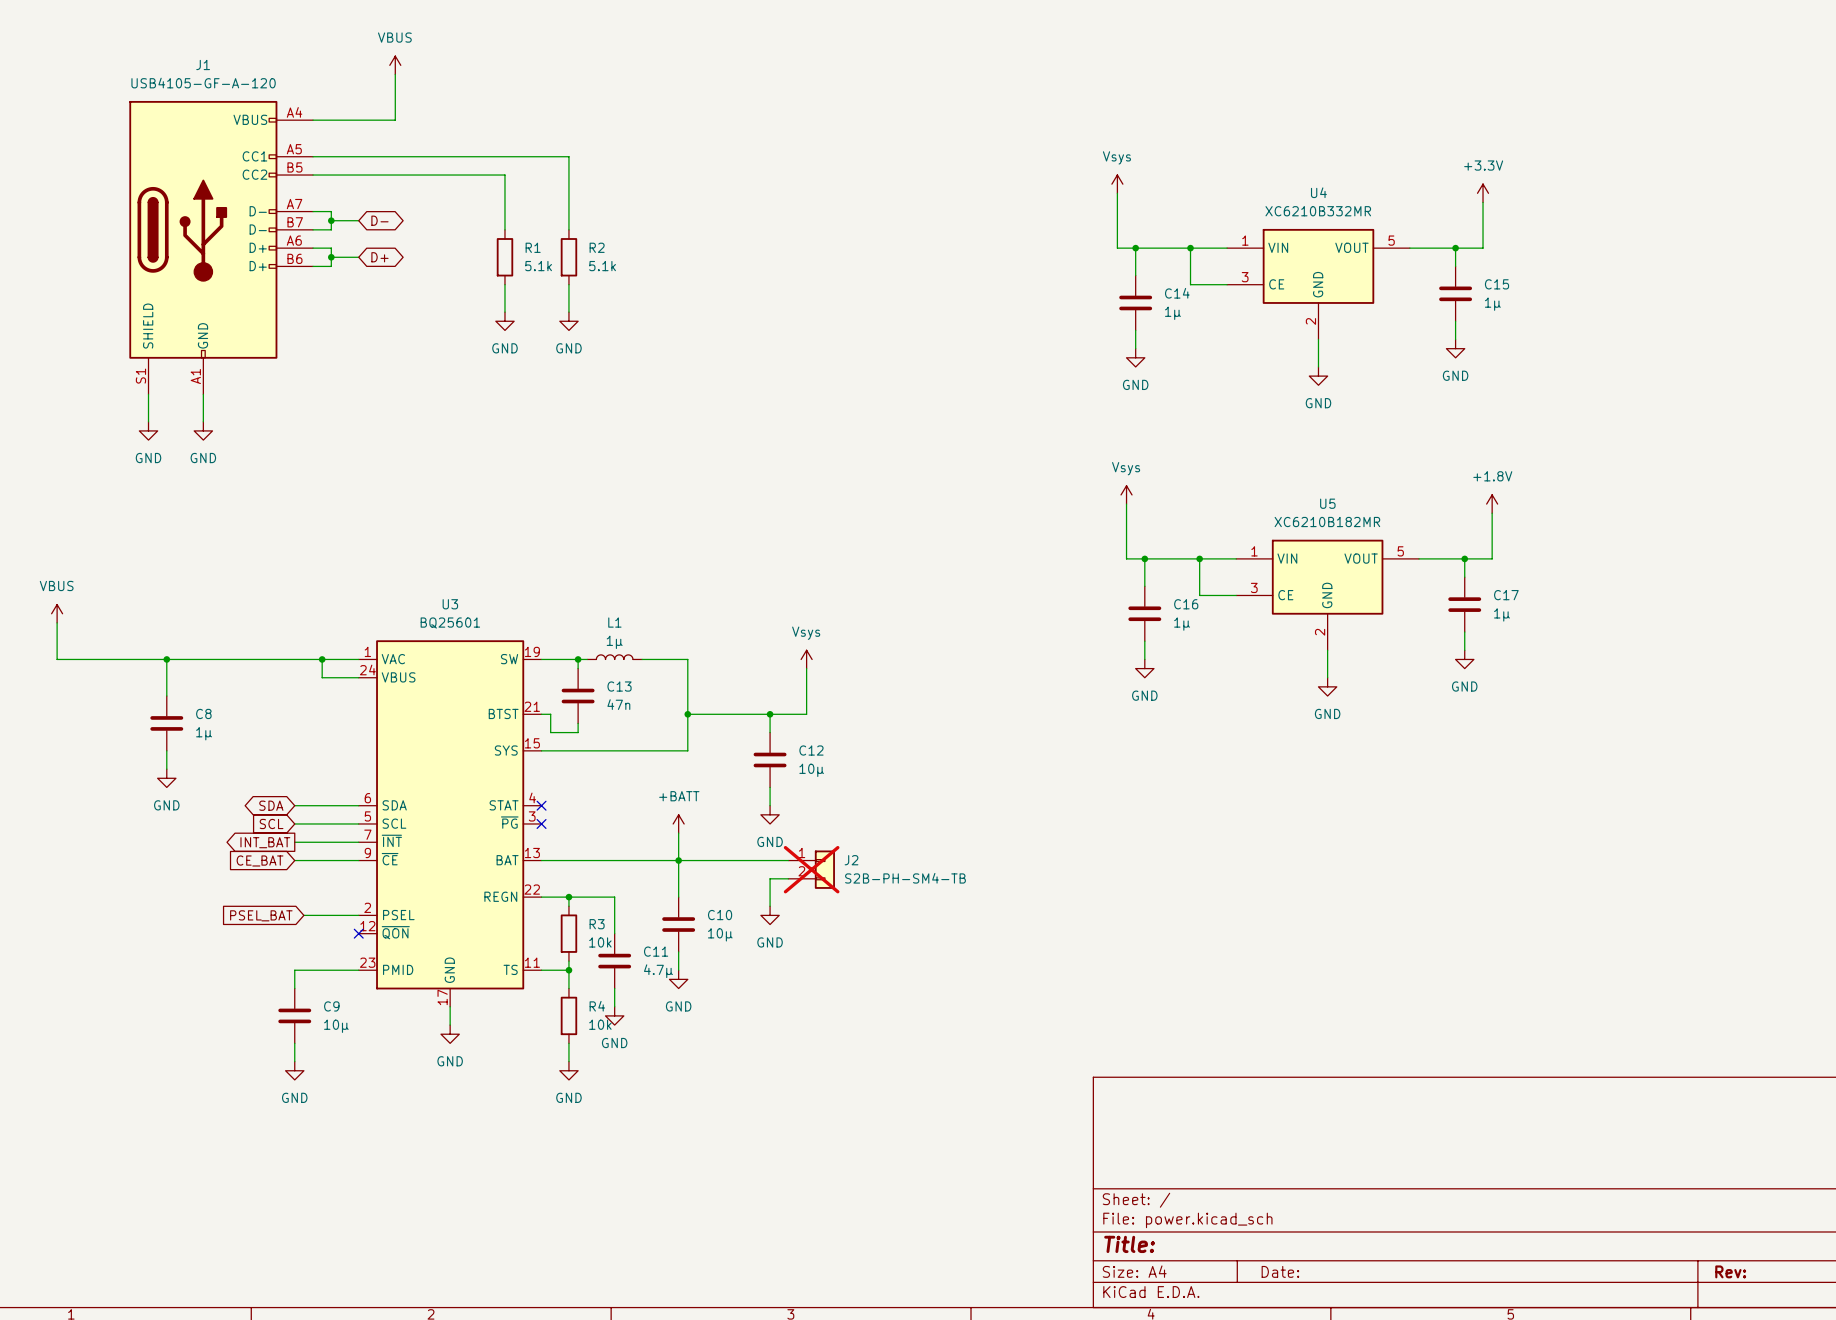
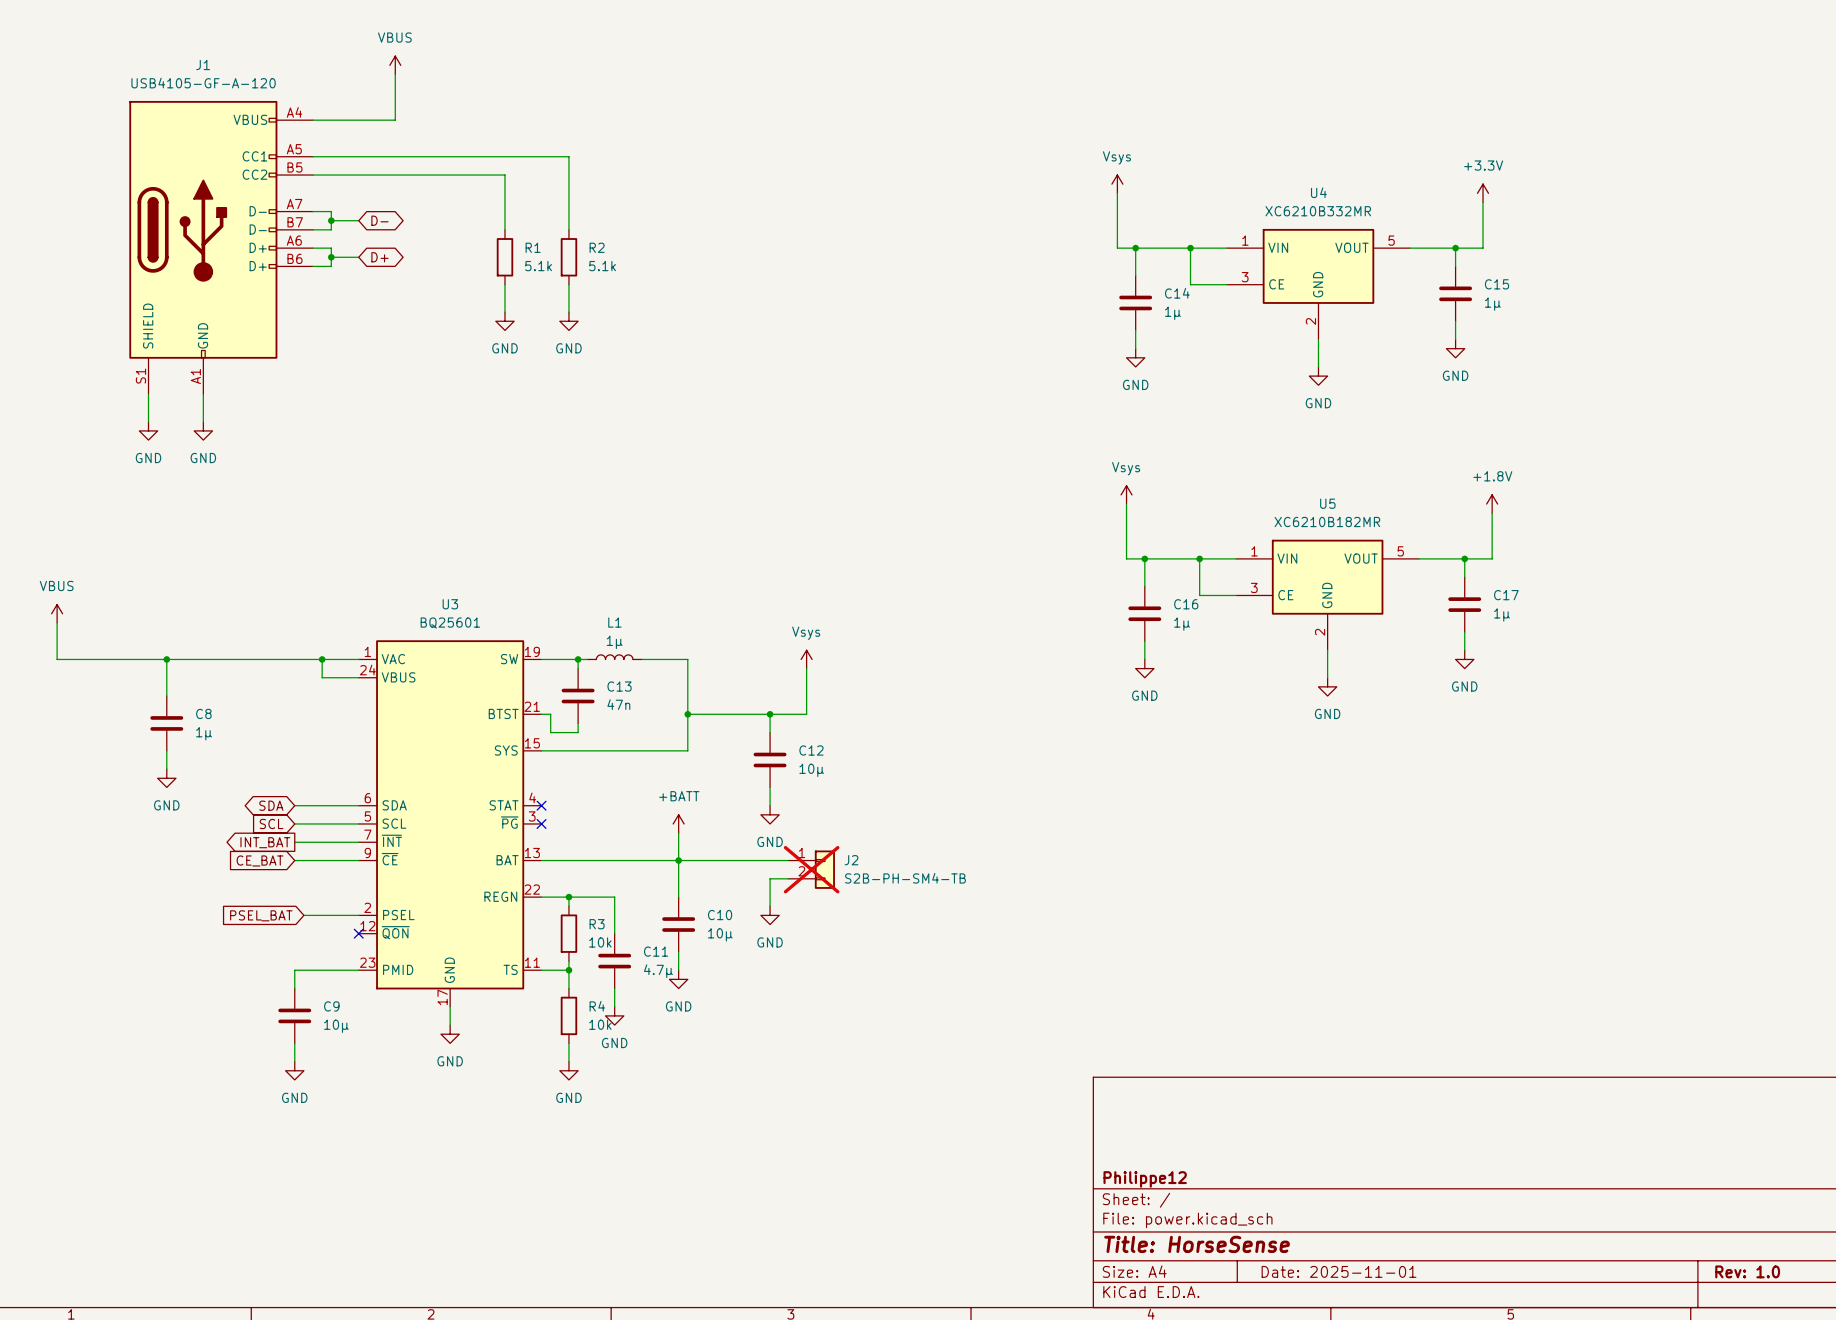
title block: none -> Philippe12 (1145, 1179)
title block: Title: (1129, 1244) -> Title: HorseSense (1197, 1244)
title block: Date: (1280, 1271) -> Date: 2025-11-01 (1339, 1271)
title block: Rev: (1730, 1271) -> Rev: 1.0 (1747, 1271)

